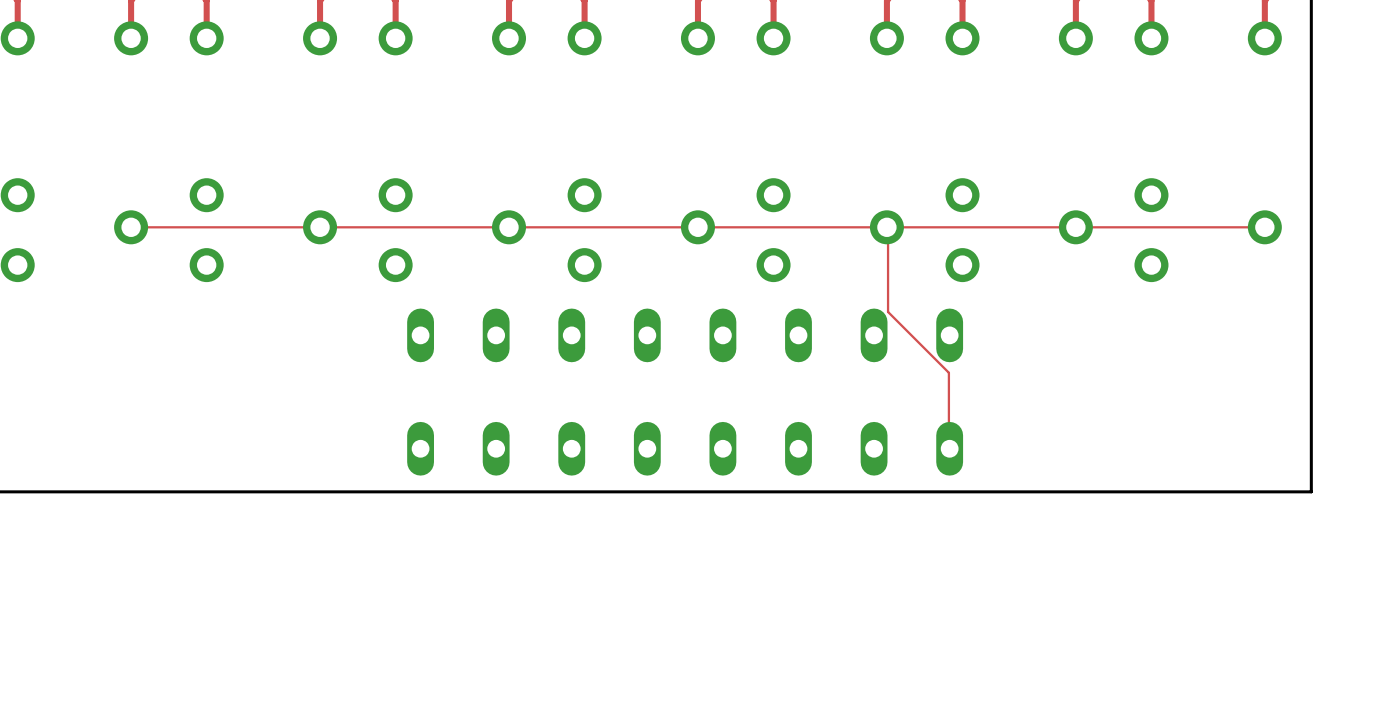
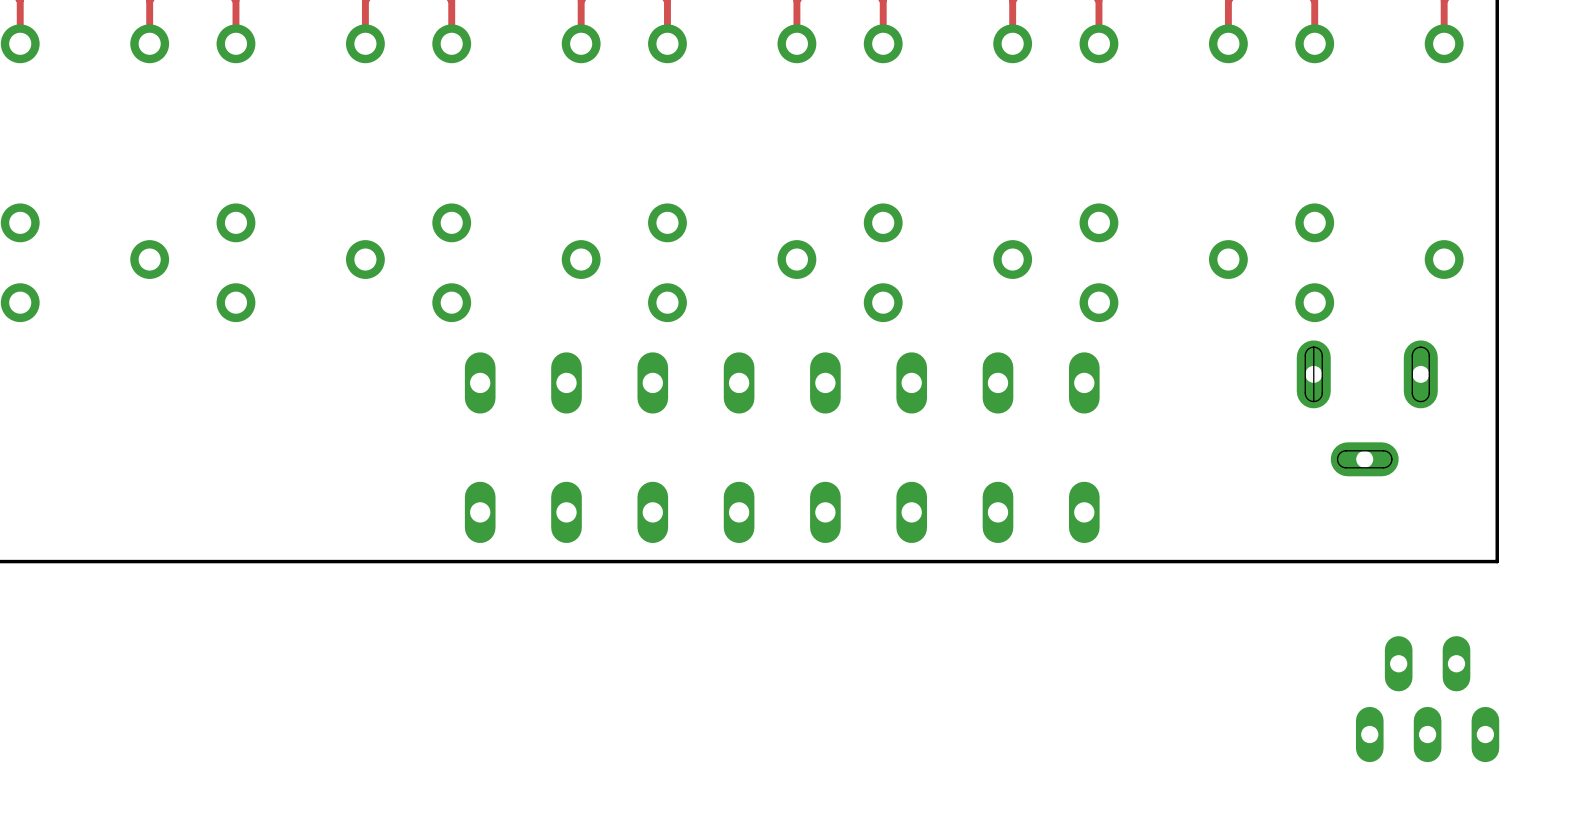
top track: (888, 227) (888, 311) (948, 372) (949, 448) -> none
top track: (1264, 227) (131, 227) -> none
part: none -> (1367, 408)
part: none -> (1427, 699)

